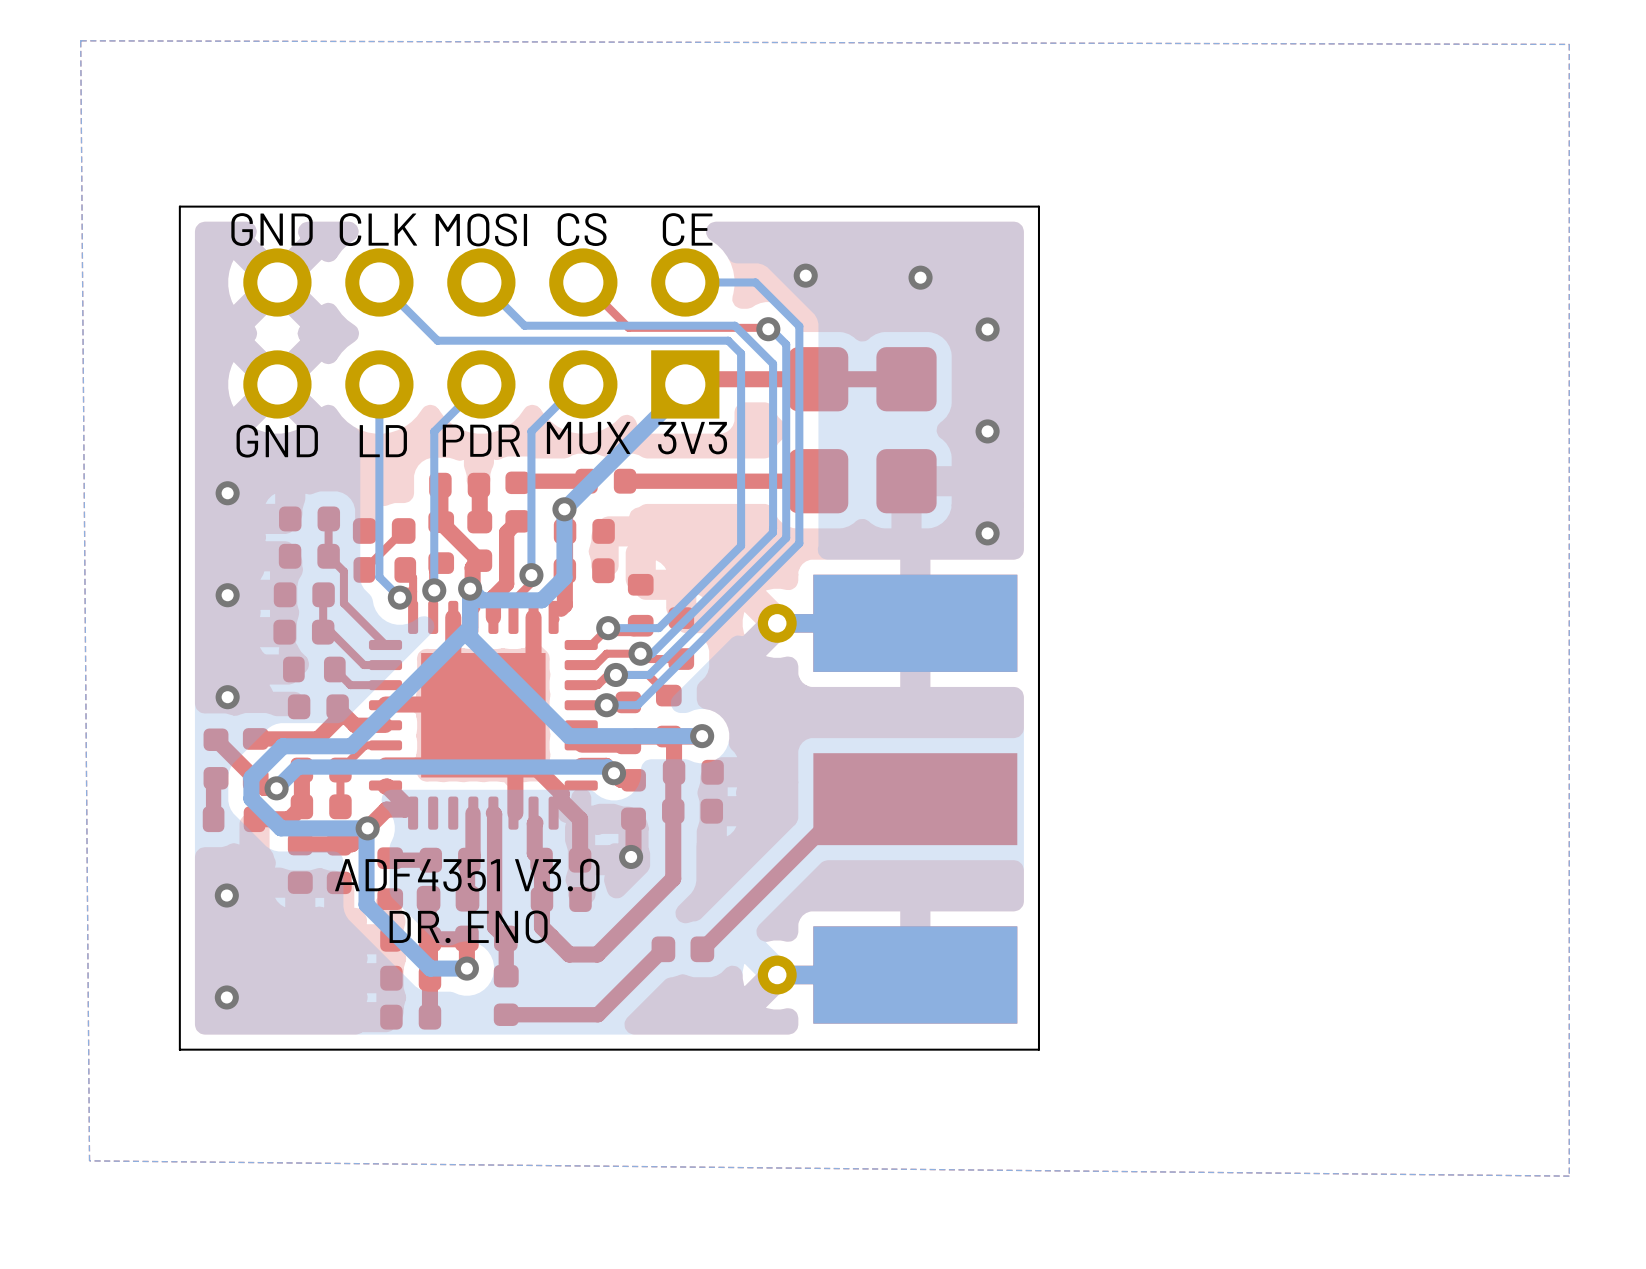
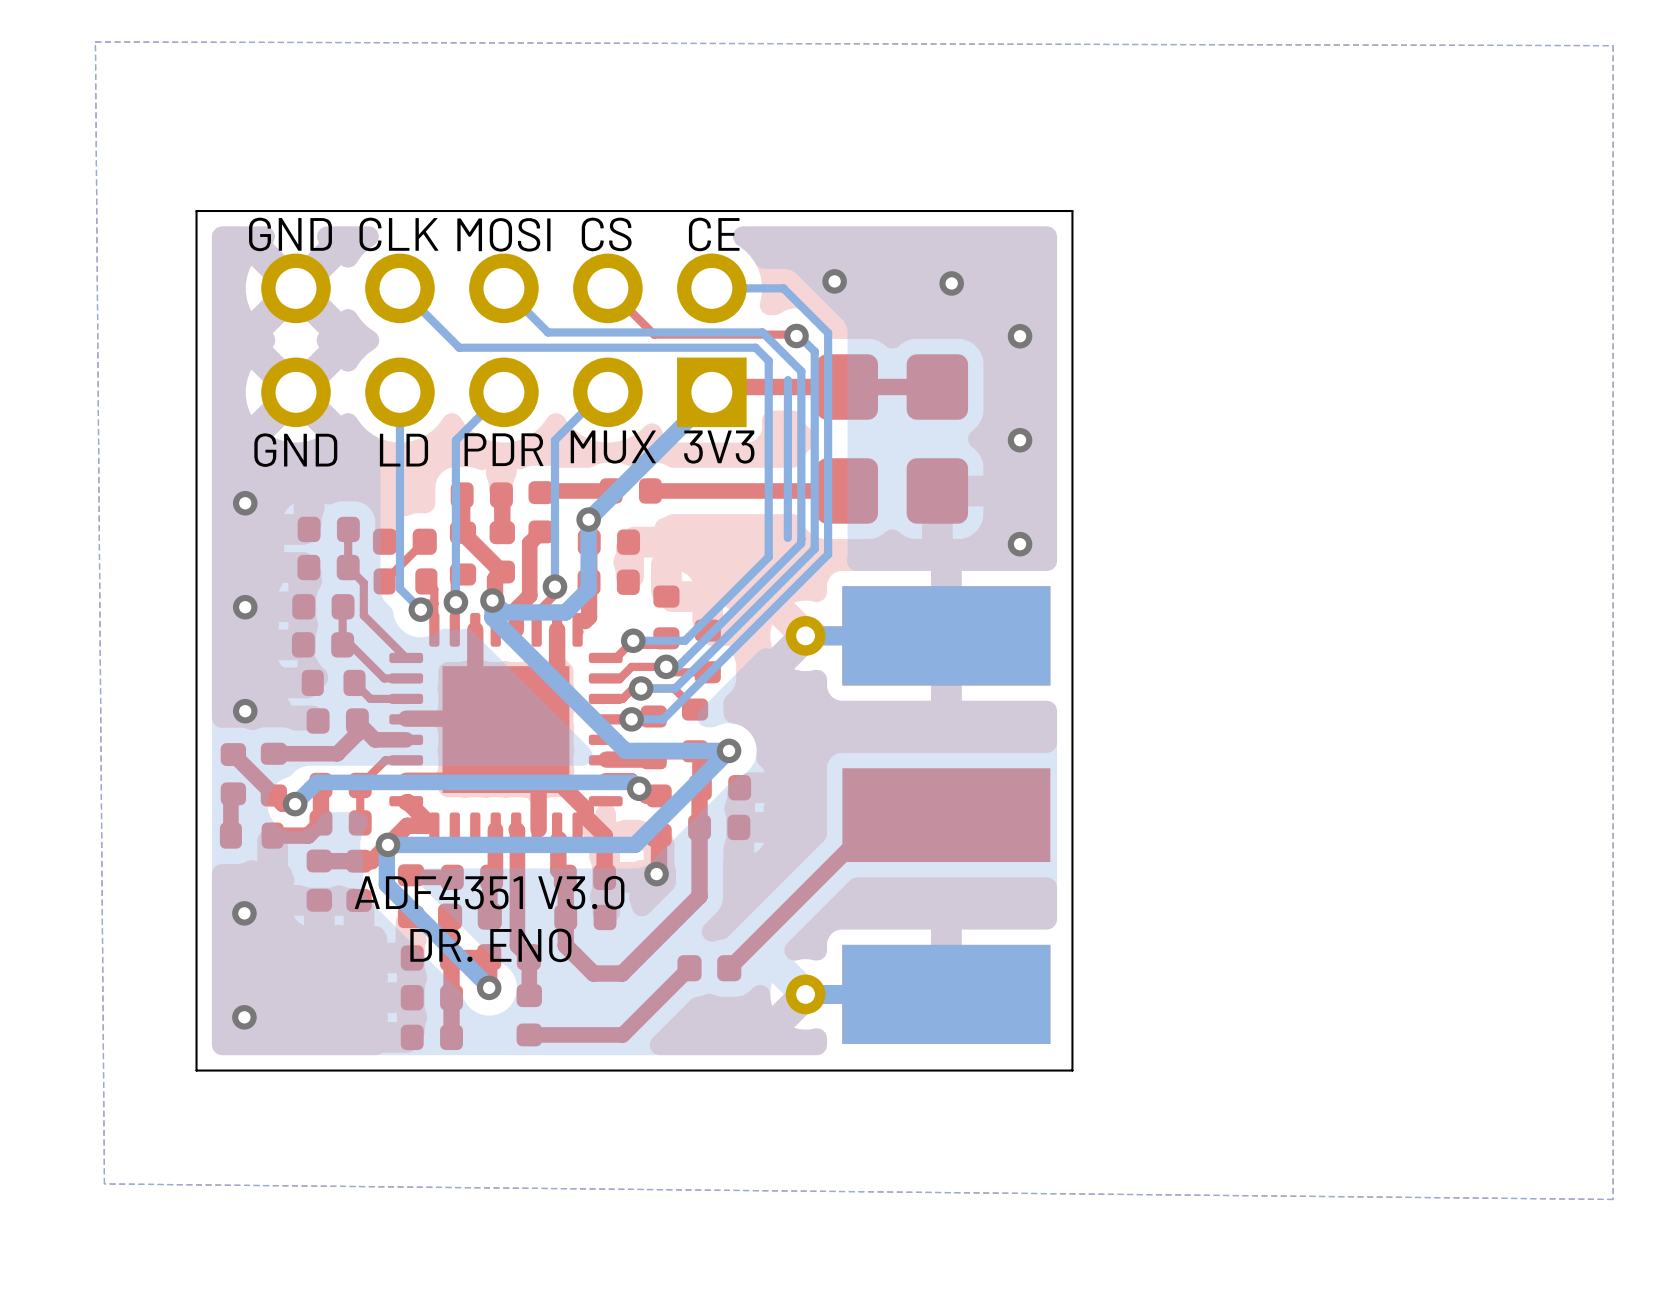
bottom track: none -> (787, 380) (787, 537)
bottom track: (470, 605) (470, 637) (568, 736) (600, 736) -> (492, 617) (625, 750)
bottom track: (470, 627) (351, 746) (283, 746) (251, 777) (251, 798) (280, 828) (367, 828) -> (729, 750) (635, 844) (387, 844)
bottom track: (366, 867) (366, 904) (430, 968) (466, 968) -> (386, 884) (489, 987)

